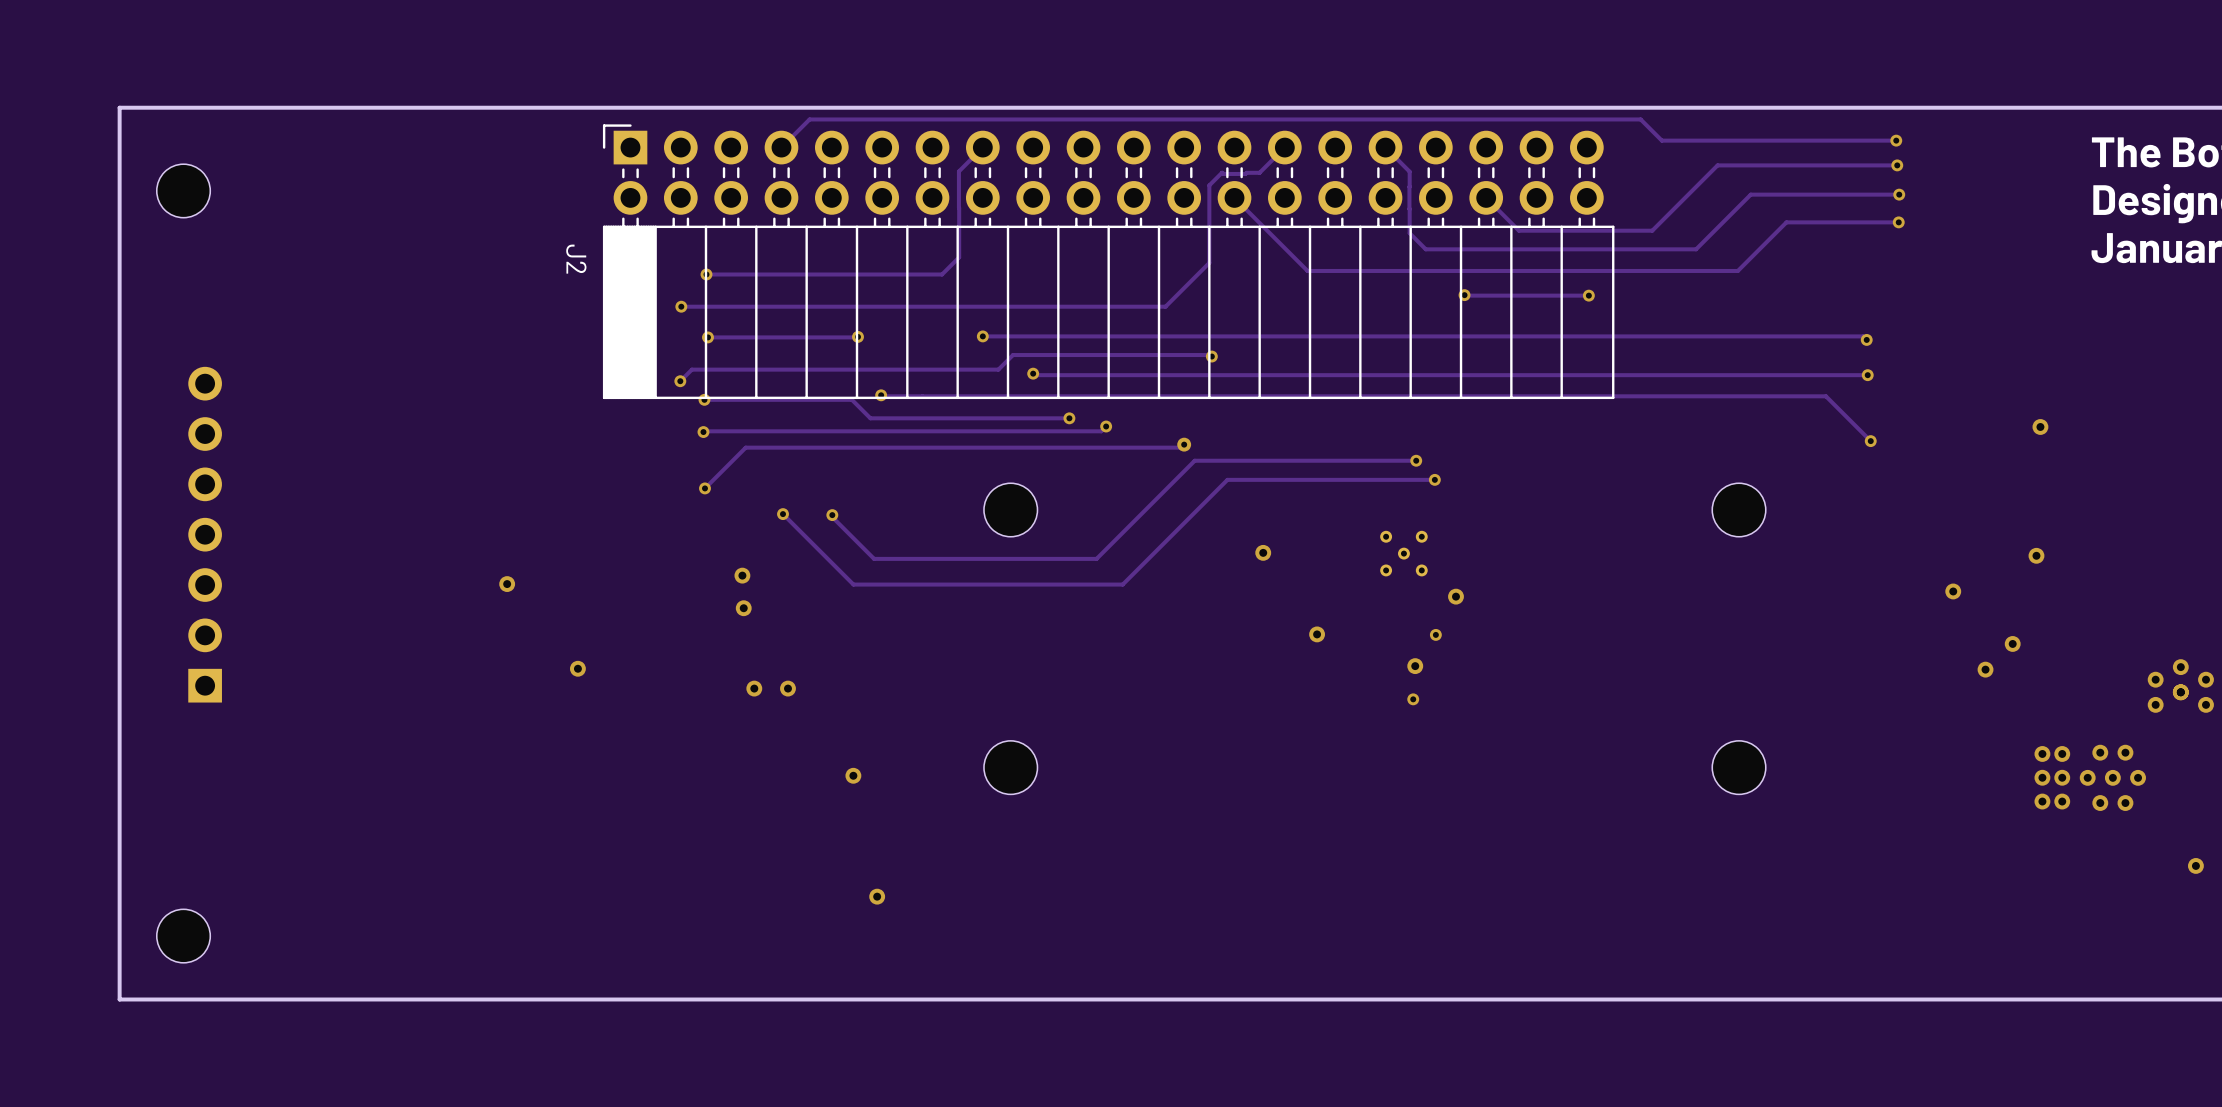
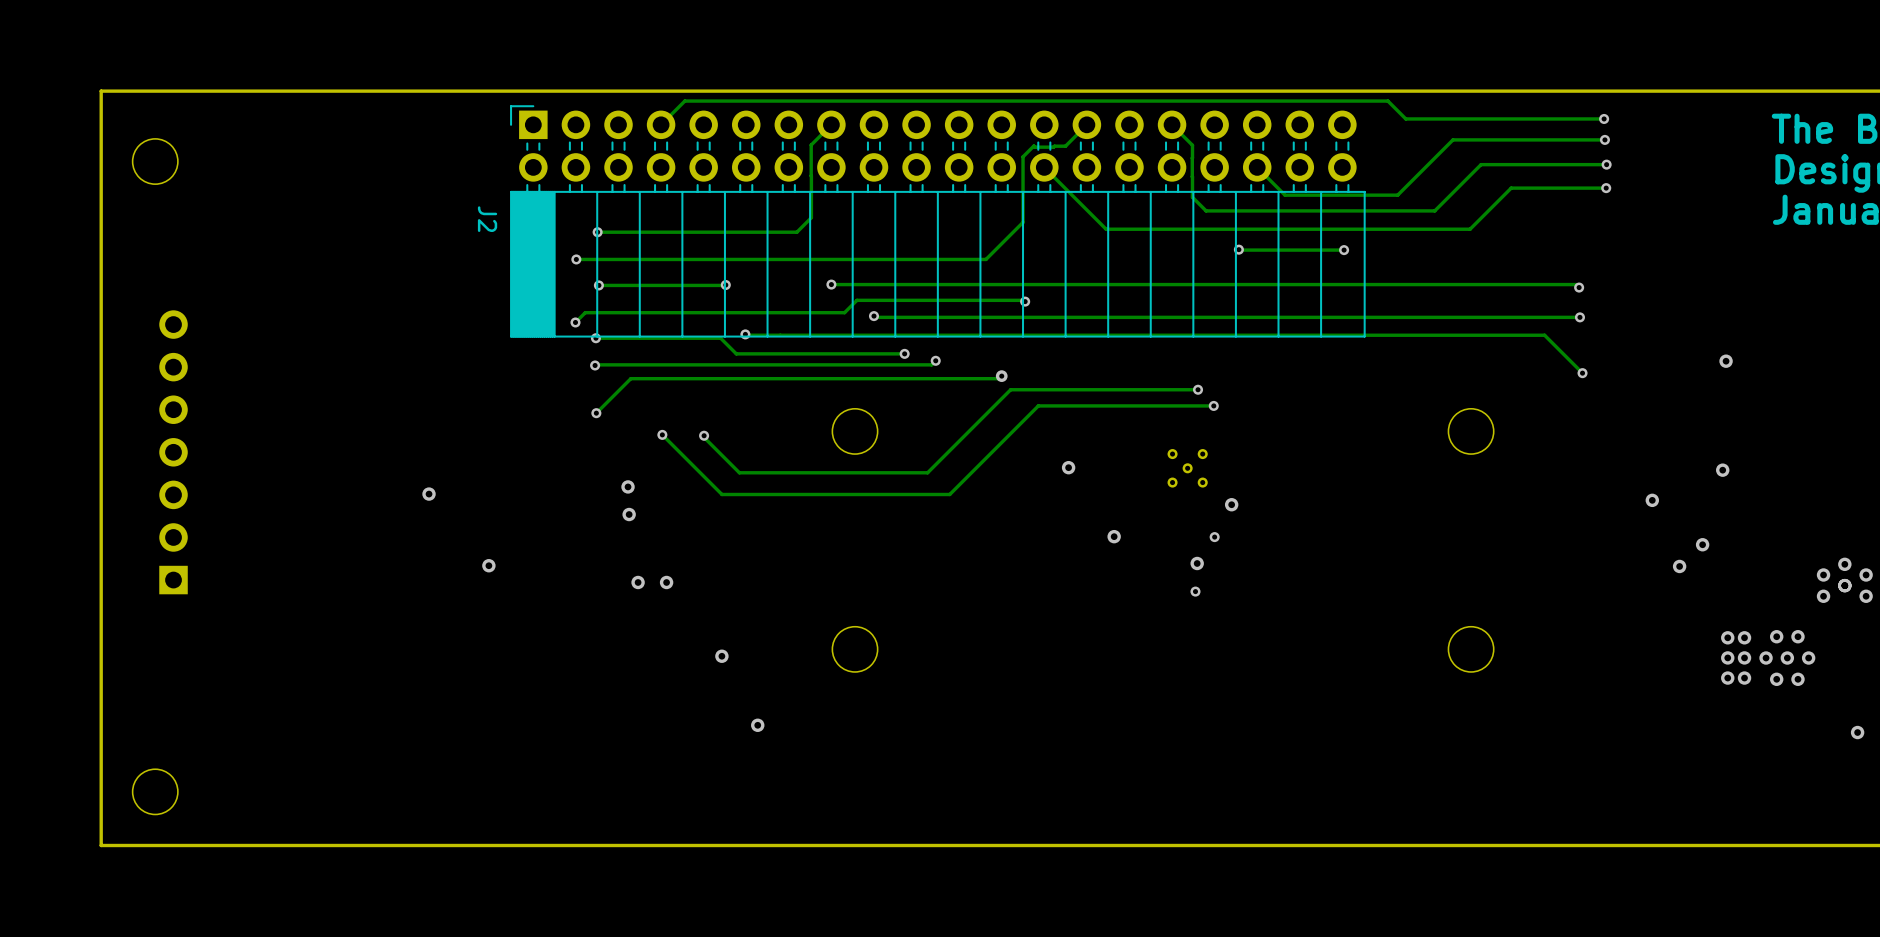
via position: (877, 896) -> (757, 725)

